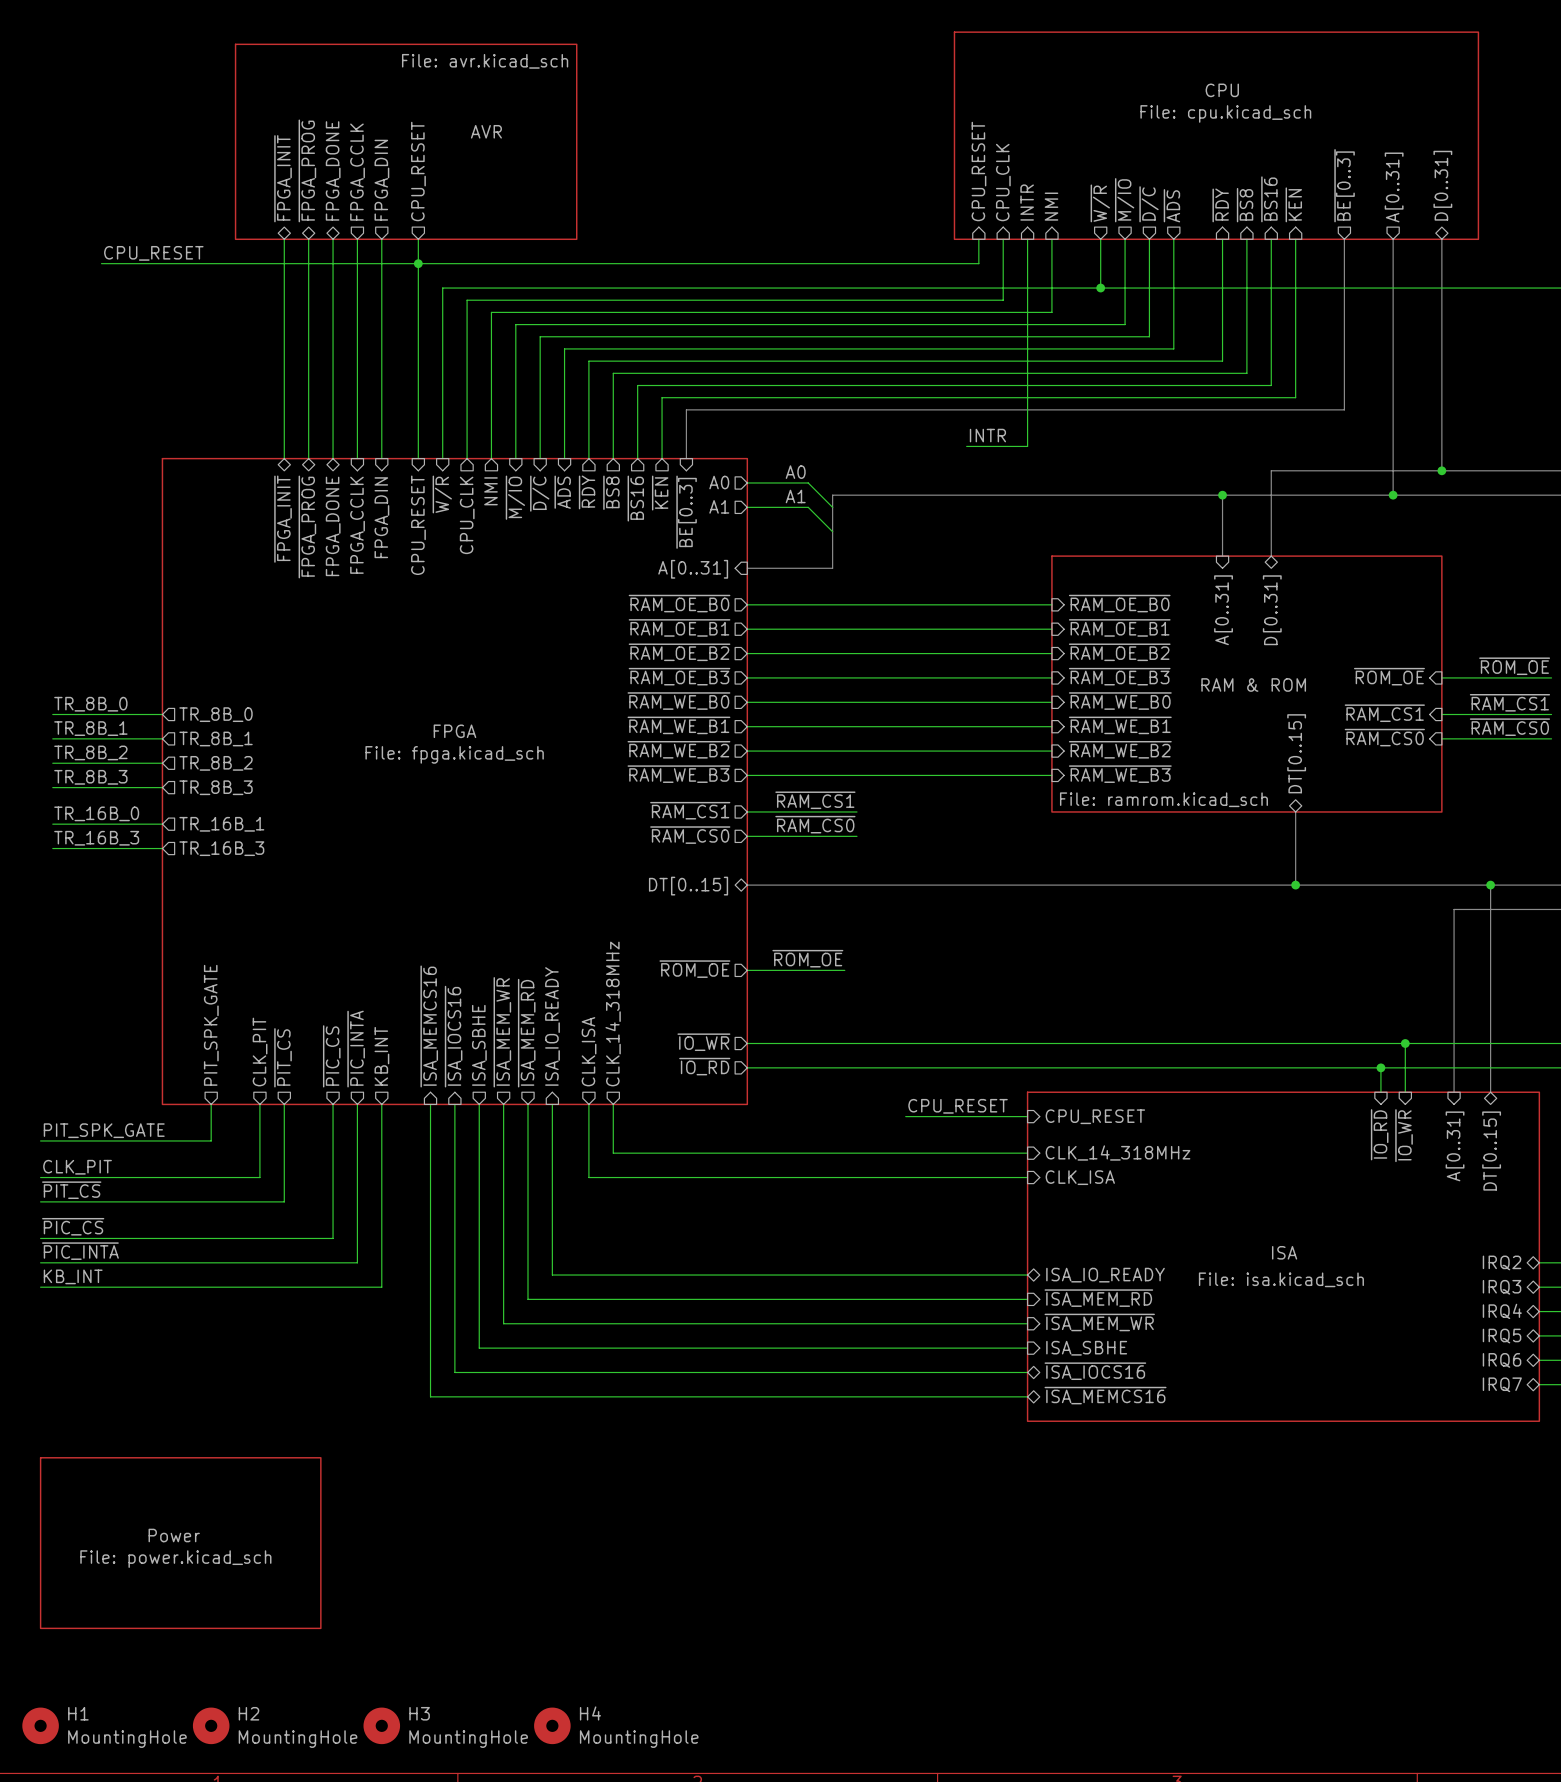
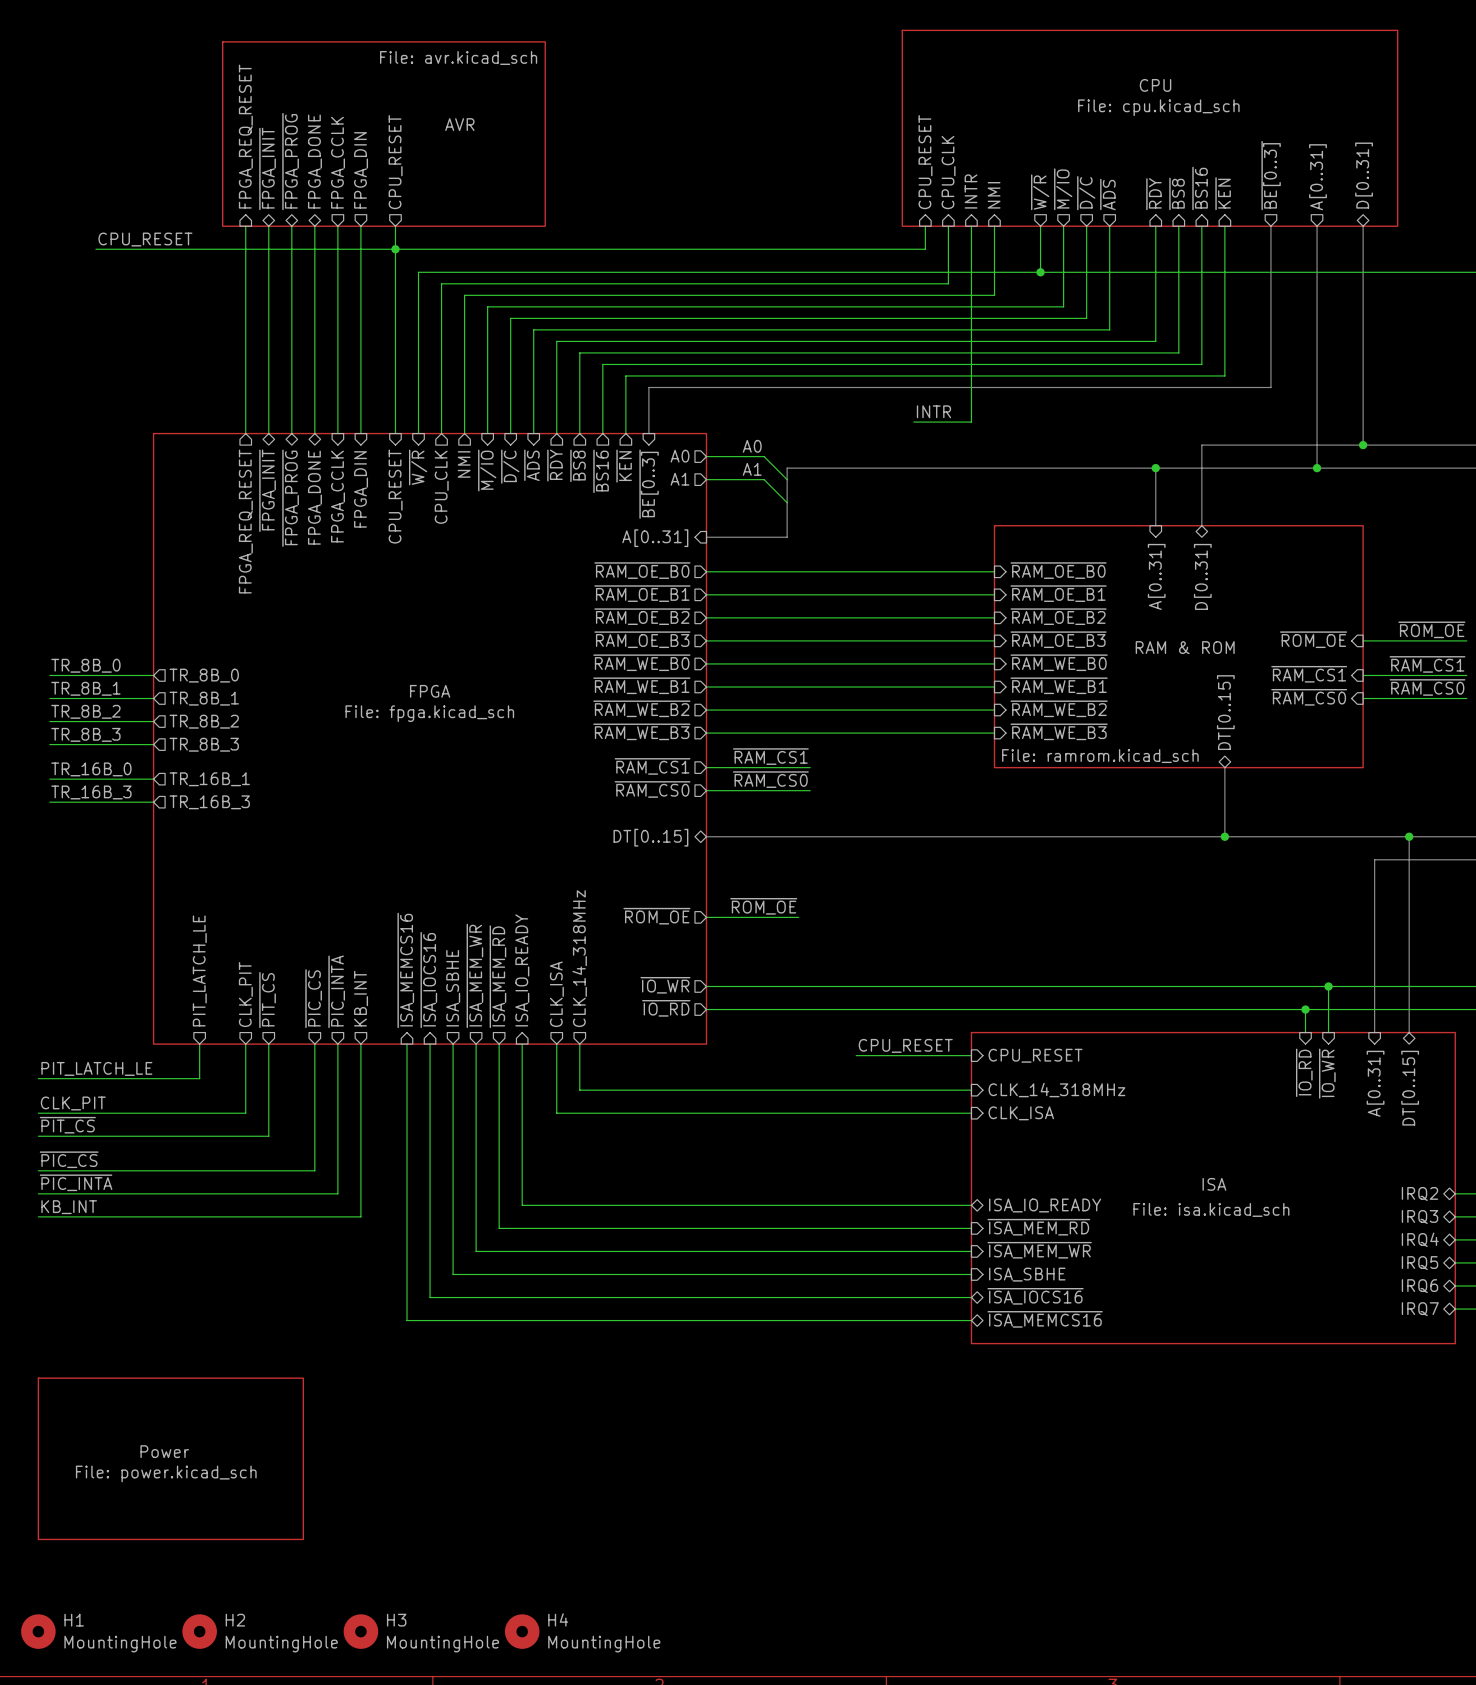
sheet pin: none -> FPGA_REQ_RESET (245, 136)
wire: none -> (245, 226) (245, 433)
sheet pin: none -> FPGA_REQ_RESET (245, 521)
sheet pin: PIT_SPK_GATE (211, 1025) -> PIT_LATCH_LE (199, 970)
label: PIT_SPK_GATE (104, 1130) -> PIT_LATCH_LE (96, 1068)

